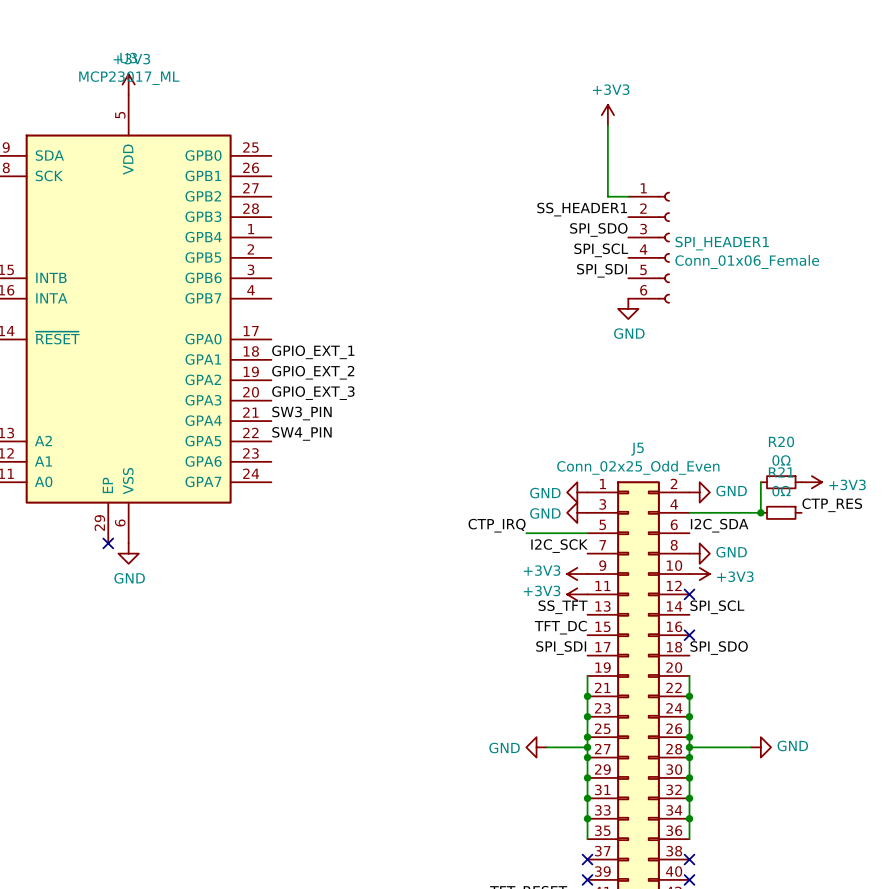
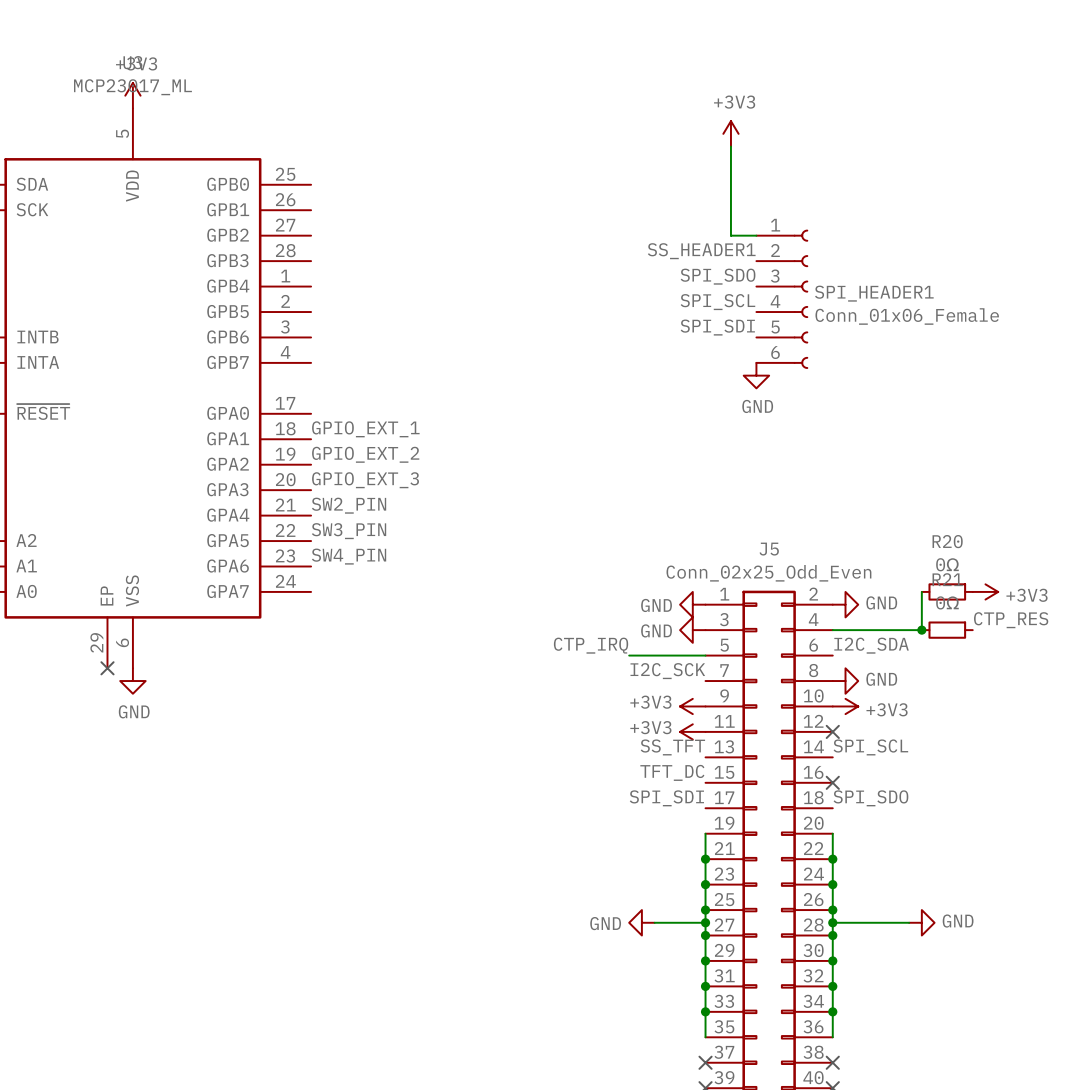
label: SW3_PIN (301, 413) -> SW2_PIN (349, 505)
label: SW4_PIN (301, 433) -> SW3_PIN (349, 531)
label: none -> SW4_PIN (349, 556)

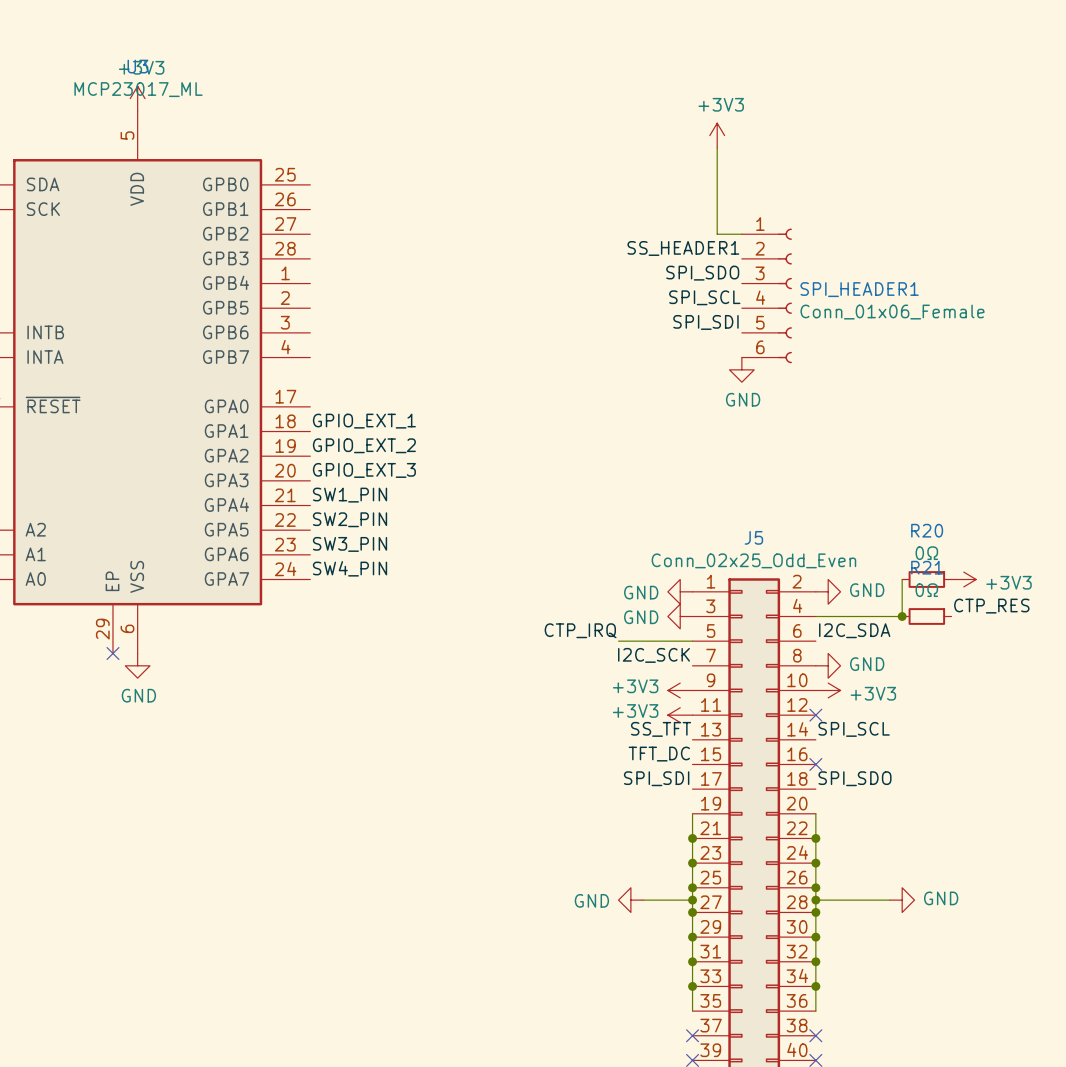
label: SW2_PIN (349, 505) -> SW1_PIN (350, 495)
label: SW3_PIN (349, 531) -> SW2_PIN (350, 519)
label: SW4_PIN (349, 556) -> SW3_PIN (350, 544)
label: none -> SW4_PIN (350, 568)

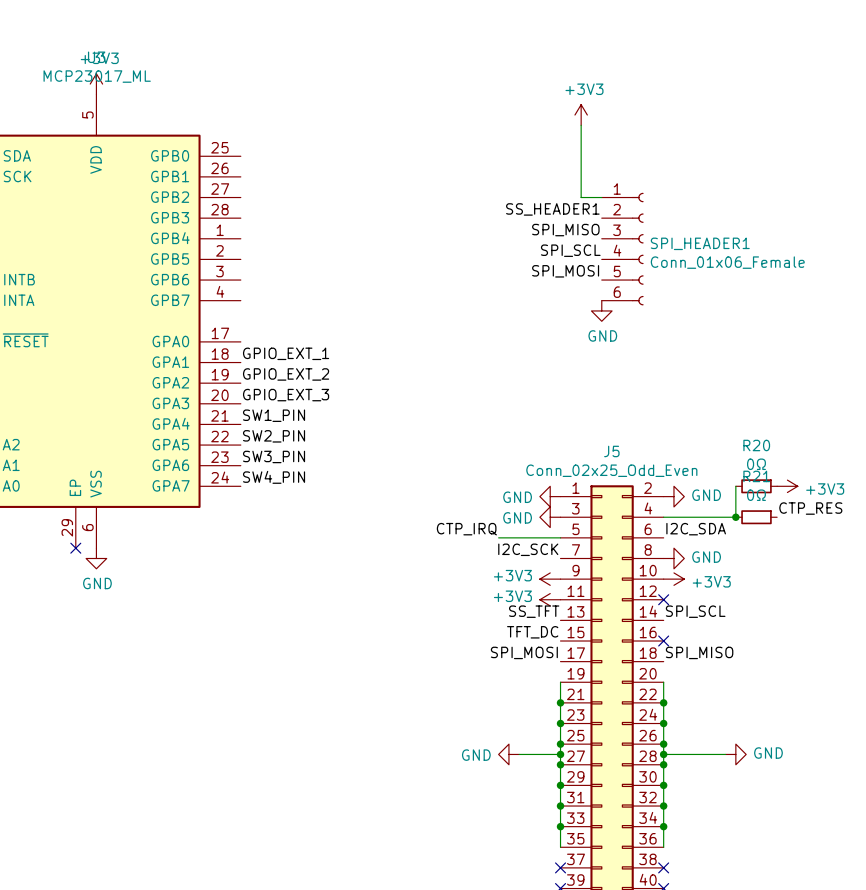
label: SPI_SDO (702, 273) -> SPI_MISO (565, 230)
label: SPI_SDI (705, 322) -> SPI_MOSI (565, 271)
label: SPI_SDI (656, 778) -> SPI_MOSI (524, 652)
label: SPI_SDO (855, 778) -> SPI_MISO (699, 652)

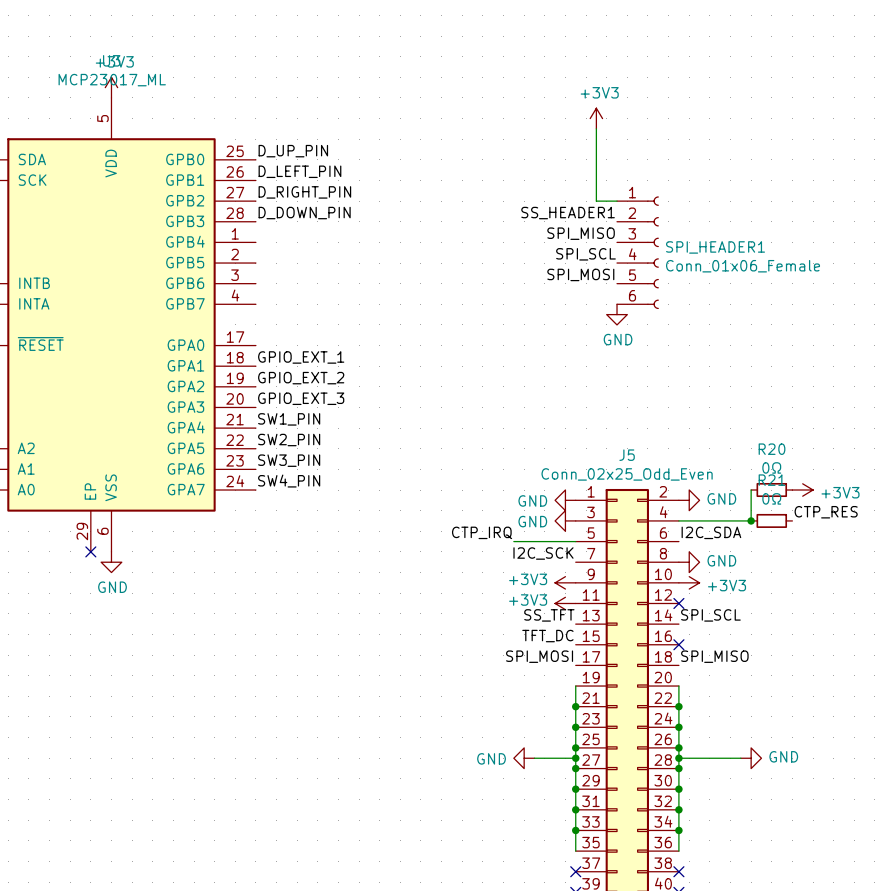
label: none -> D_UP_PIN (293, 151)
label: none -> D_LEFT_PIN (299, 171)
label: none -> D_RIGHT_PIN (304, 192)
label: none -> D_DOWN_PIN (304, 213)

